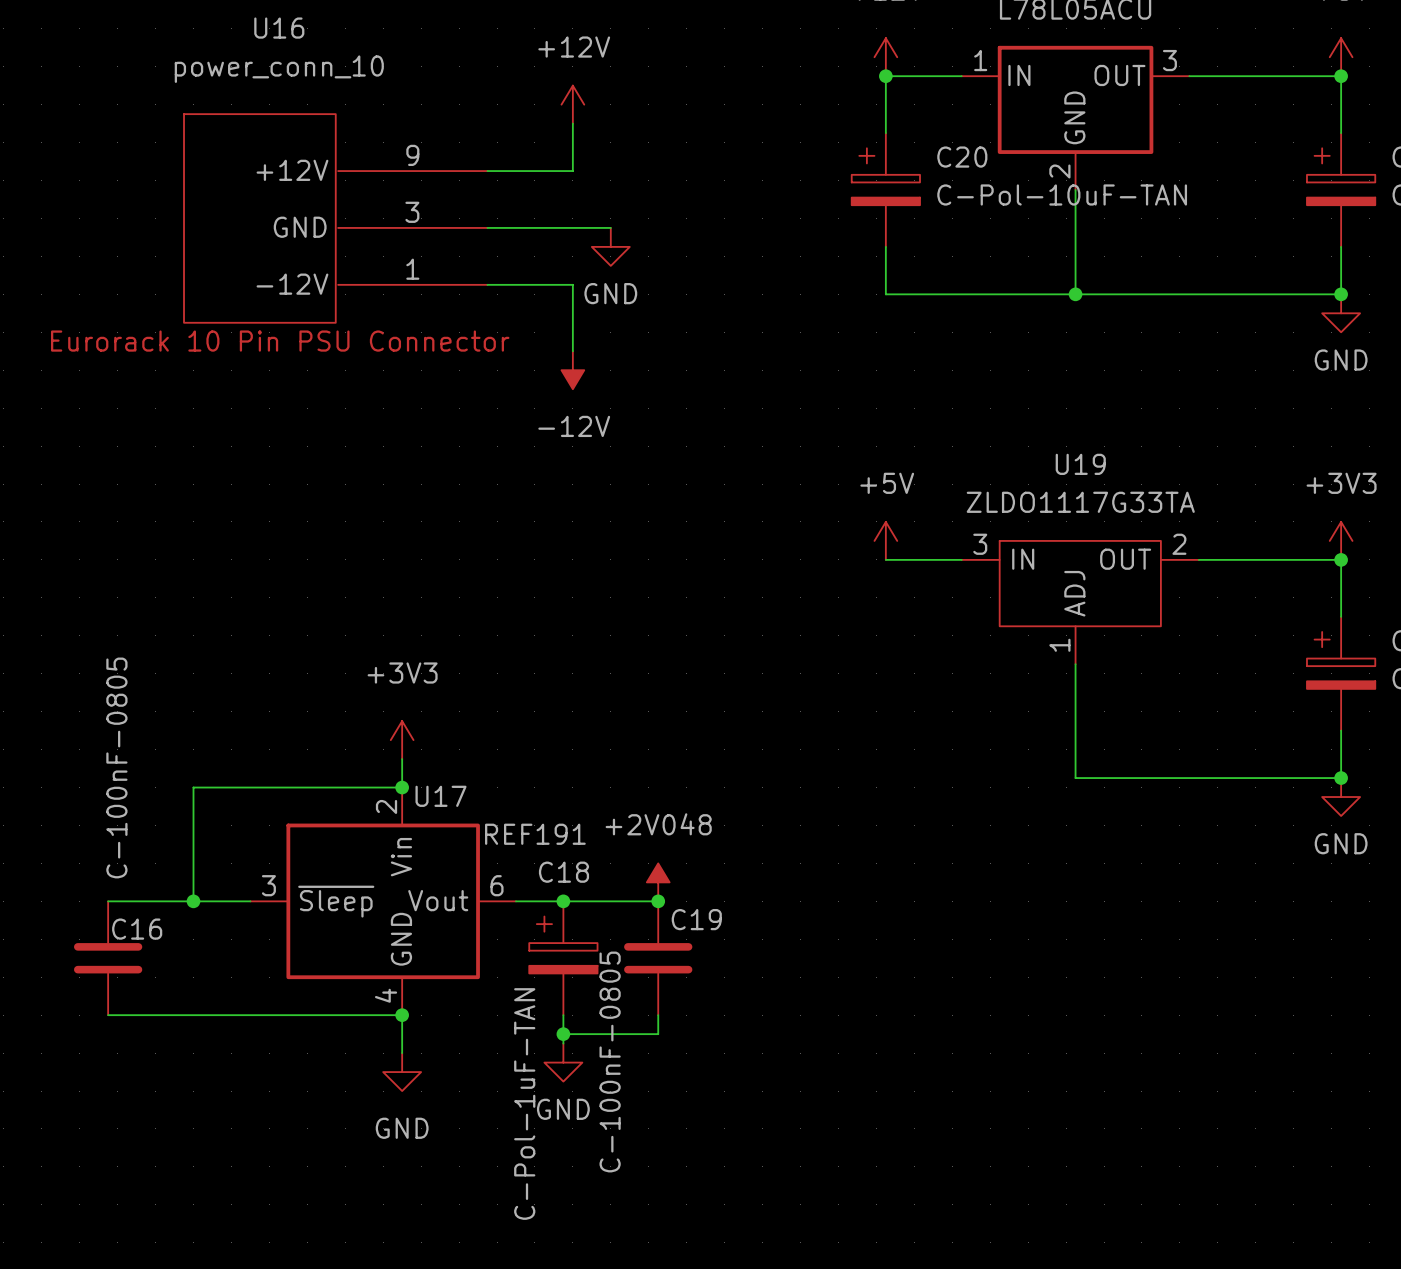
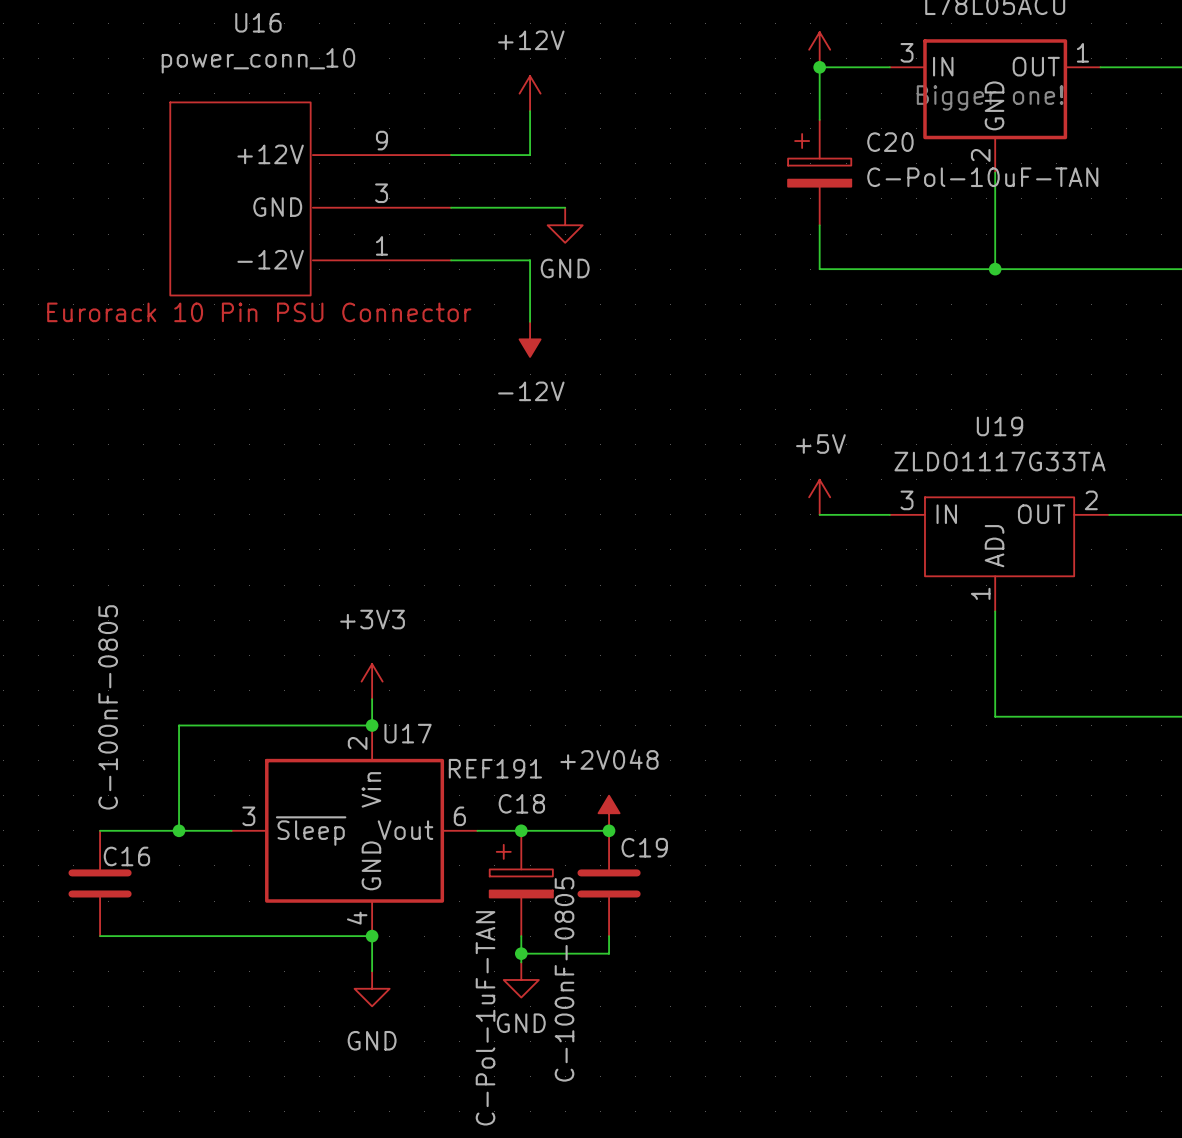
part pin number: 1 (980, 60) -> 3 (907, 52)
part pin number: 3 (1169, 60) -> 1 (1082, 52)
text: none -> Bigger one! (990, 97)

